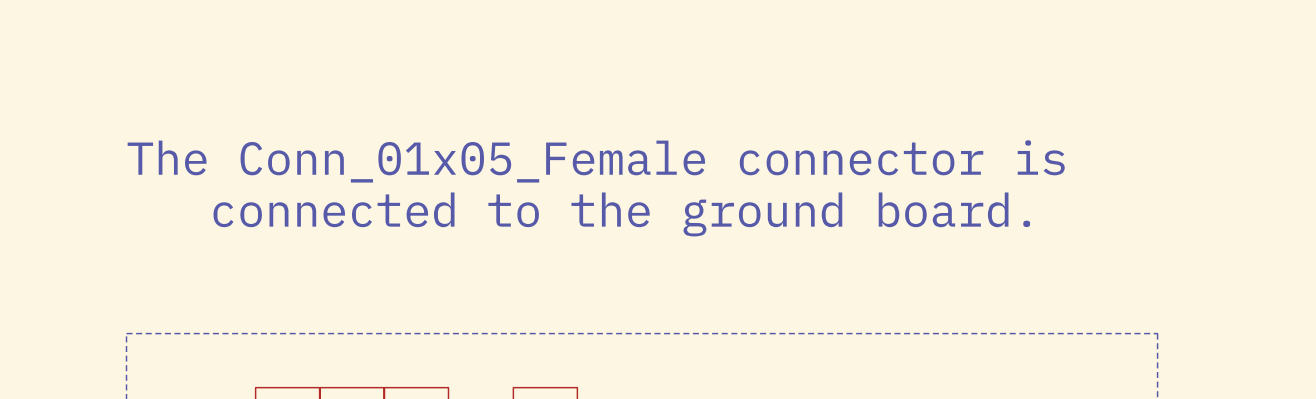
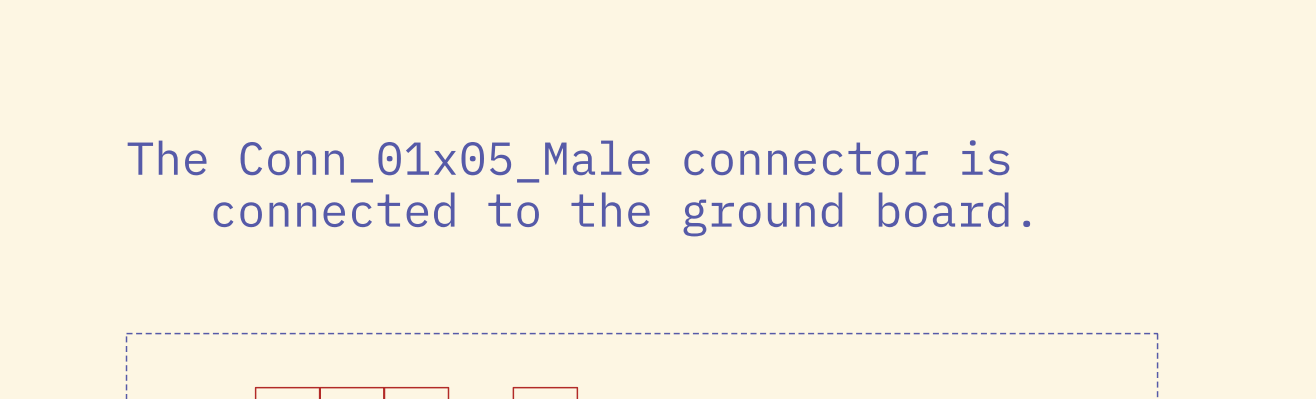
text: The Conn_01x05_Female connector is (596, 161) -> The Conn_01x05_Male connector is (568, 161)

